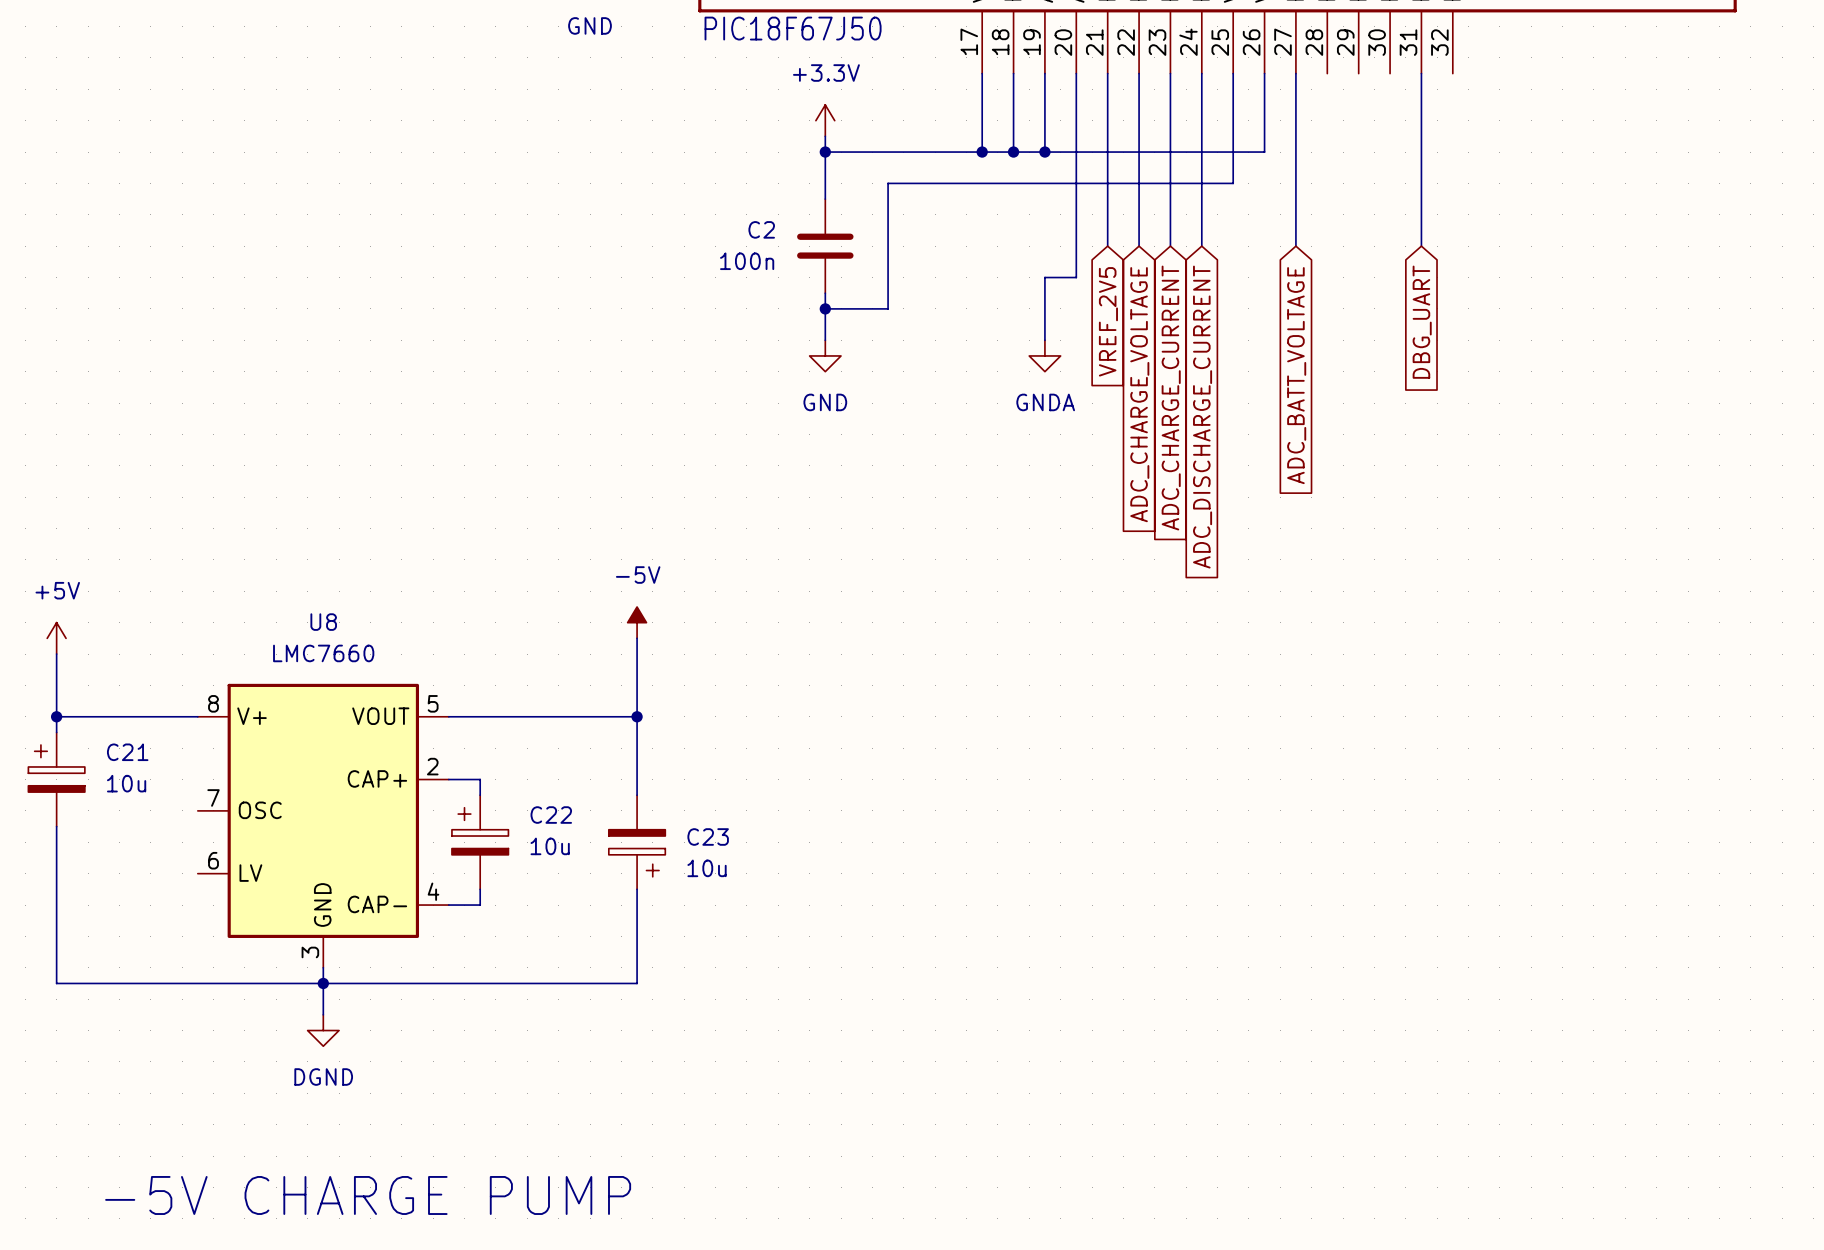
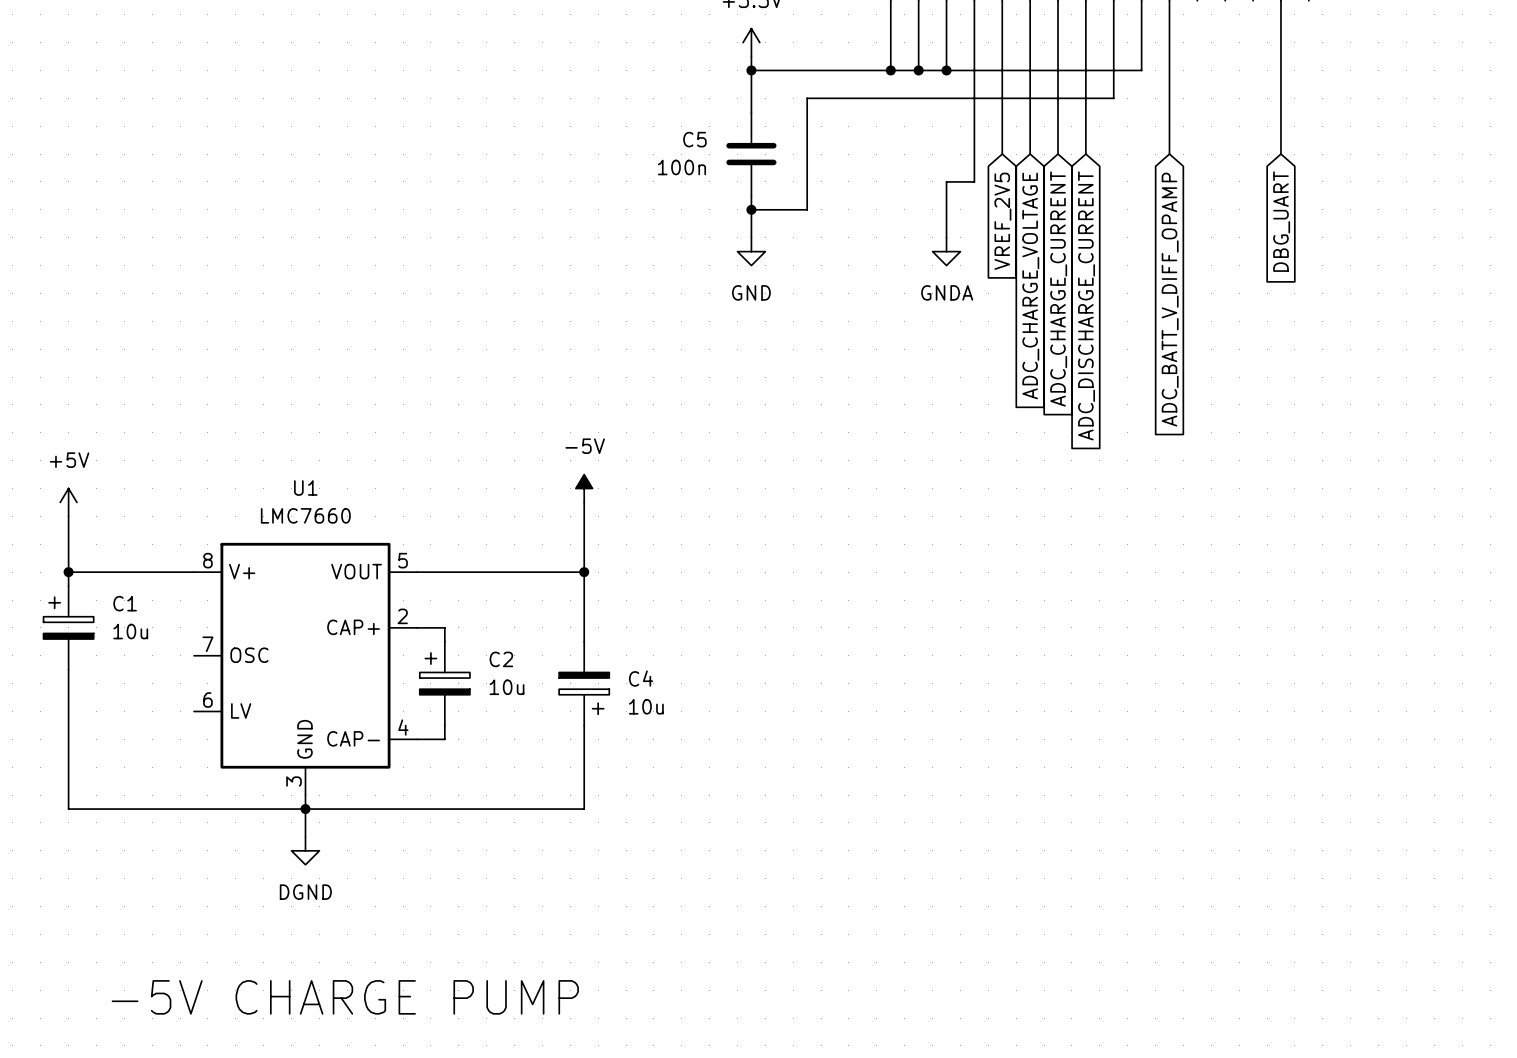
C2 name: C2 (761, 229) -> C5 (694, 139)
global label: ADC_BATT_VOLTAGE (1296, 375) -> ADC_BATT_V_DIFF_OPAMP (1170, 299)
U8 name: U8 (323, 622) -> U1 (305, 488)
C21 name: C21 (127, 752) -> C1 (125, 603)
C22 name: C22 (551, 815) -> C2 (501, 659)
C23 name: C23 (708, 836) -> C4 (641, 678)

